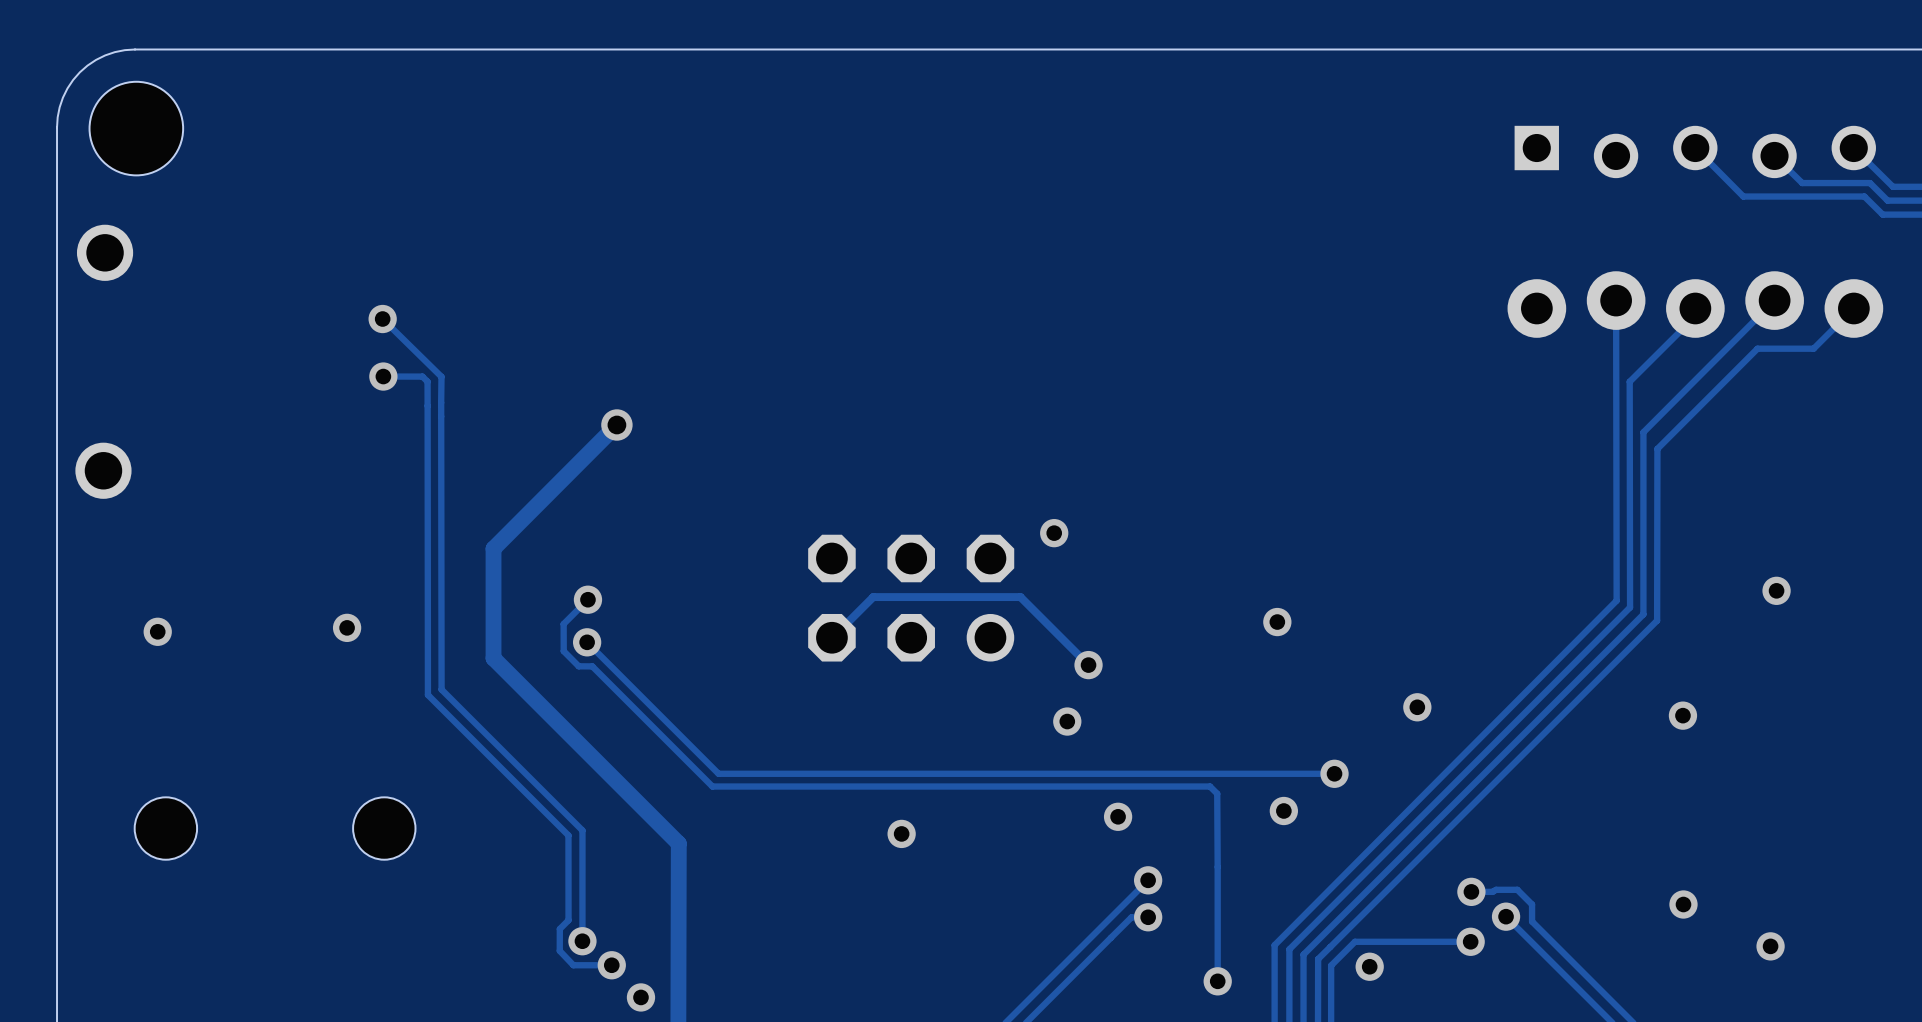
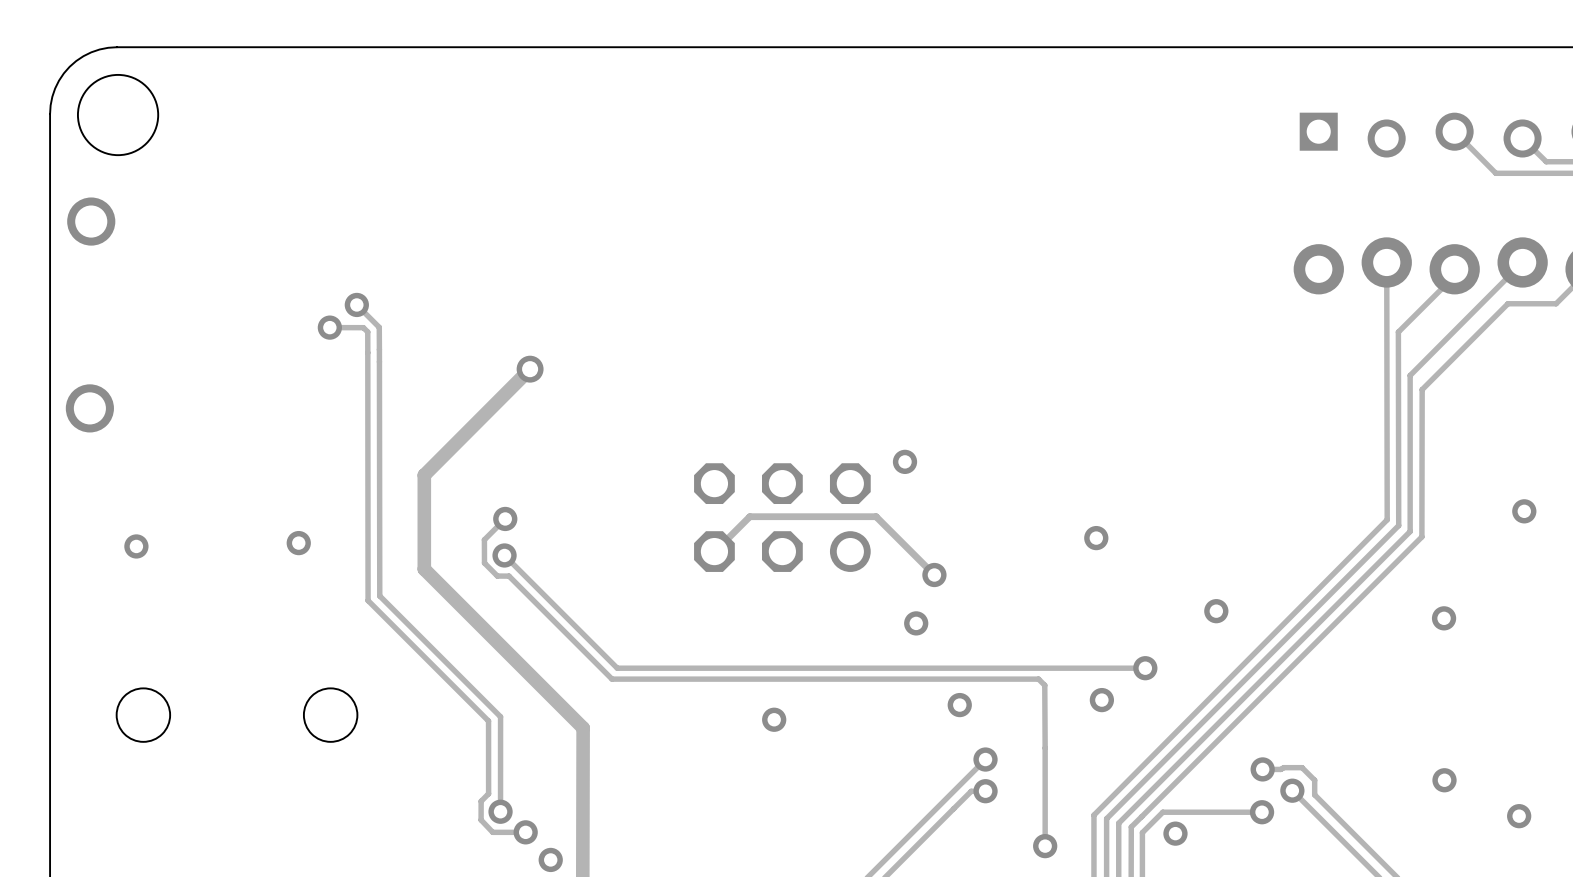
track: (382, 319) (441, 376) (441, 402) -> (356, 304) (379, 327) (379, 349)
via position: (382, 319) -> (356, 304)

